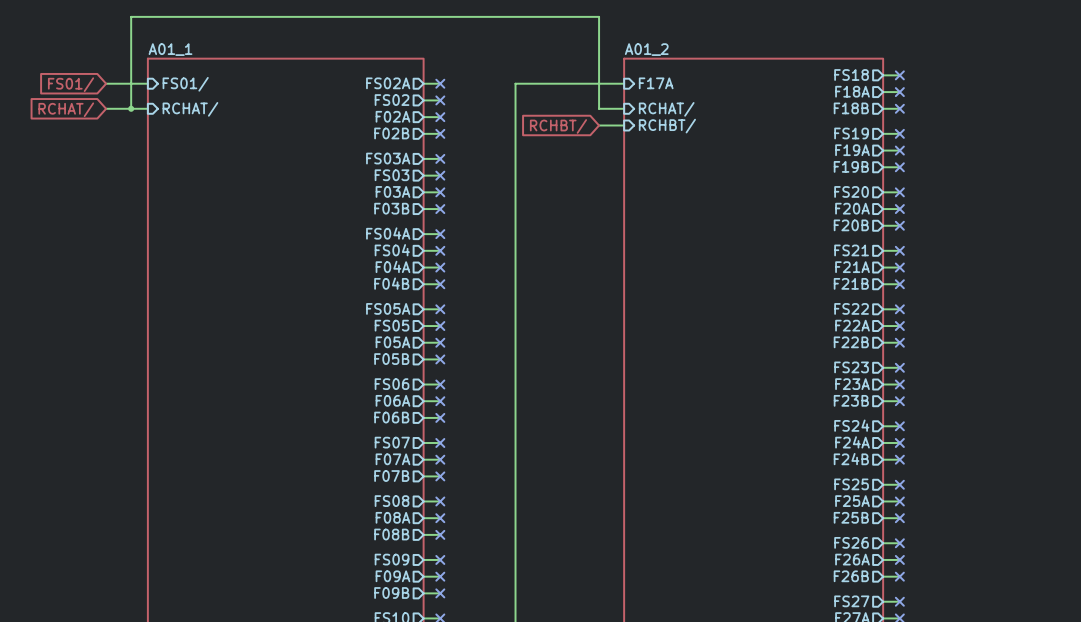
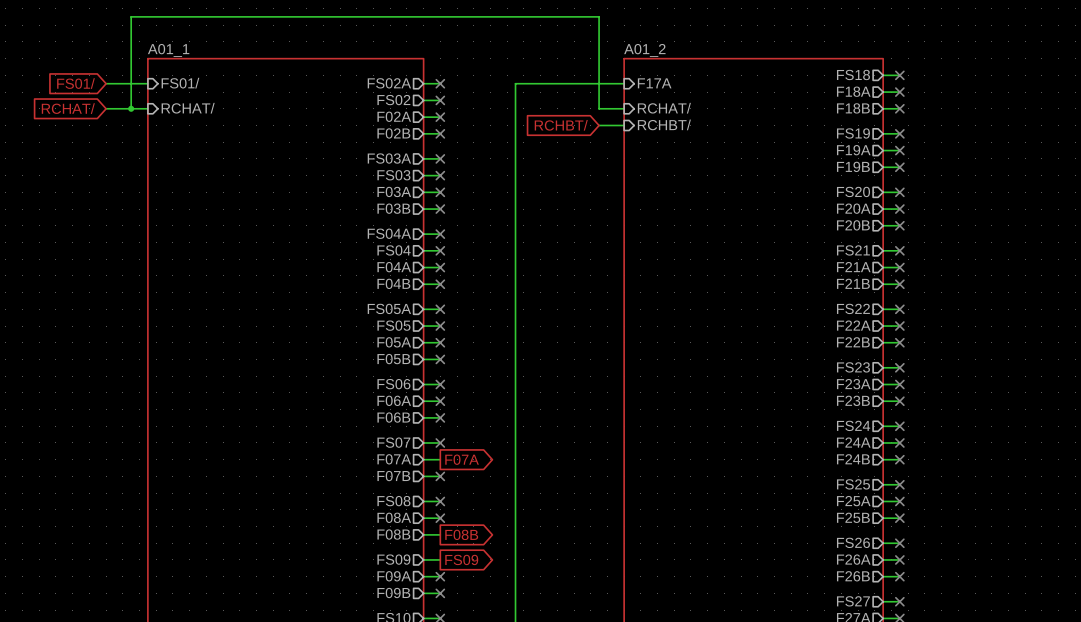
no-connect mark: (440, 459) -> none
global label: none -> F07A (462, 459)
no-connect mark: (440, 534) -> none
global label: none -> F08B (461, 534)
no-connect mark: (440, 559) -> none
global label: none -> FS09 (461, 559)

